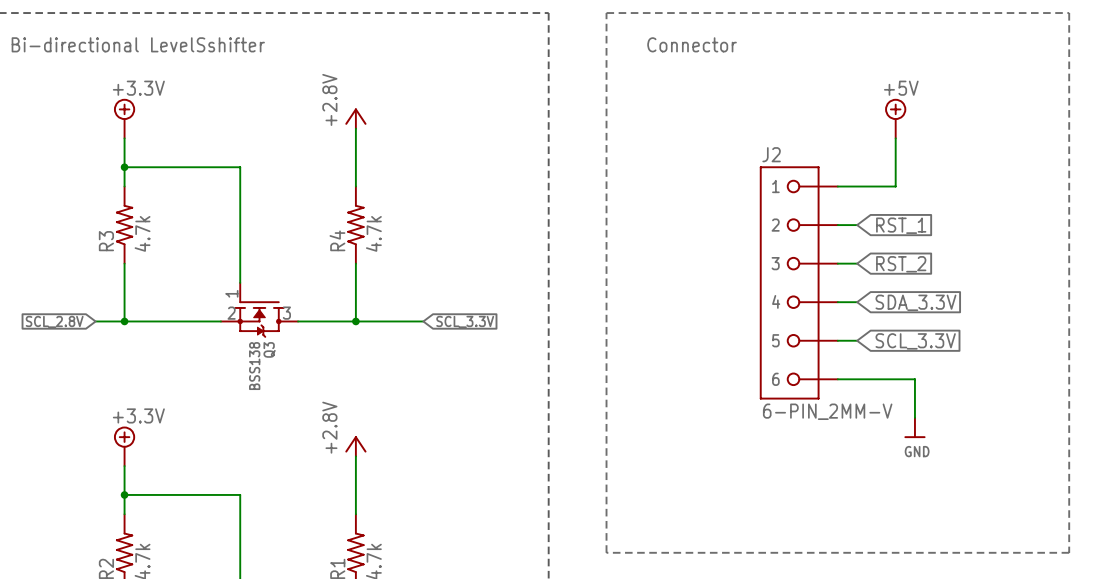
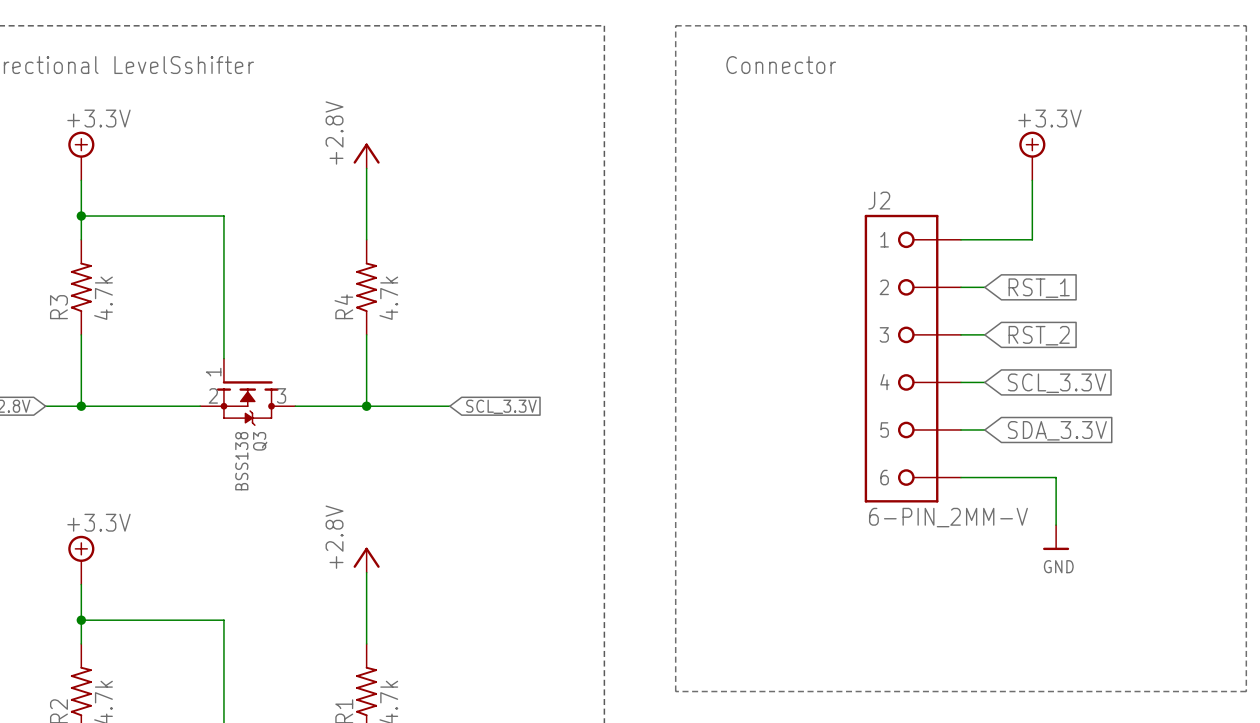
power symbol: +5V (895, 118) -> +3.3V (1032, 155)
global label: SDA_3.3V (915, 302) -> SCL_3.3V (1056, 383)
global label: SCL_3.3V (915, 341) -> SDA_3.3V (1057, 430)

